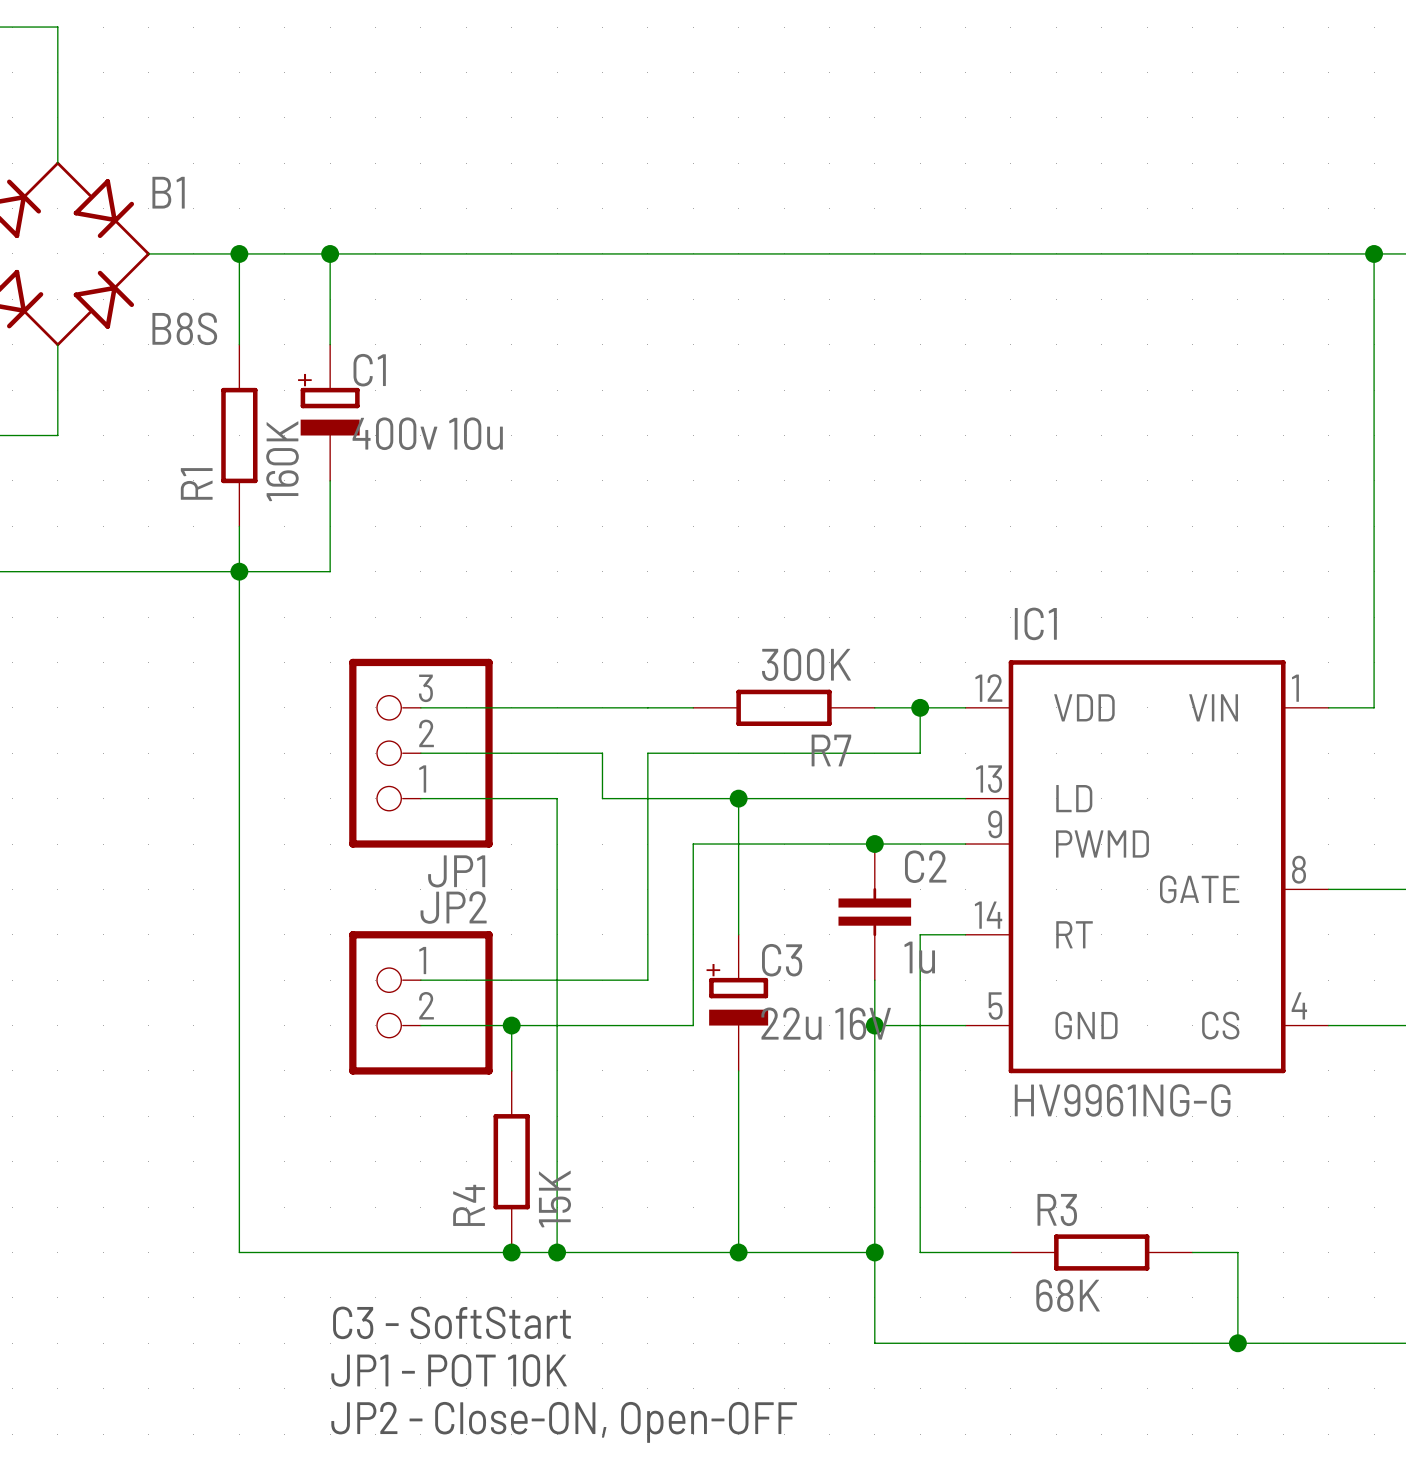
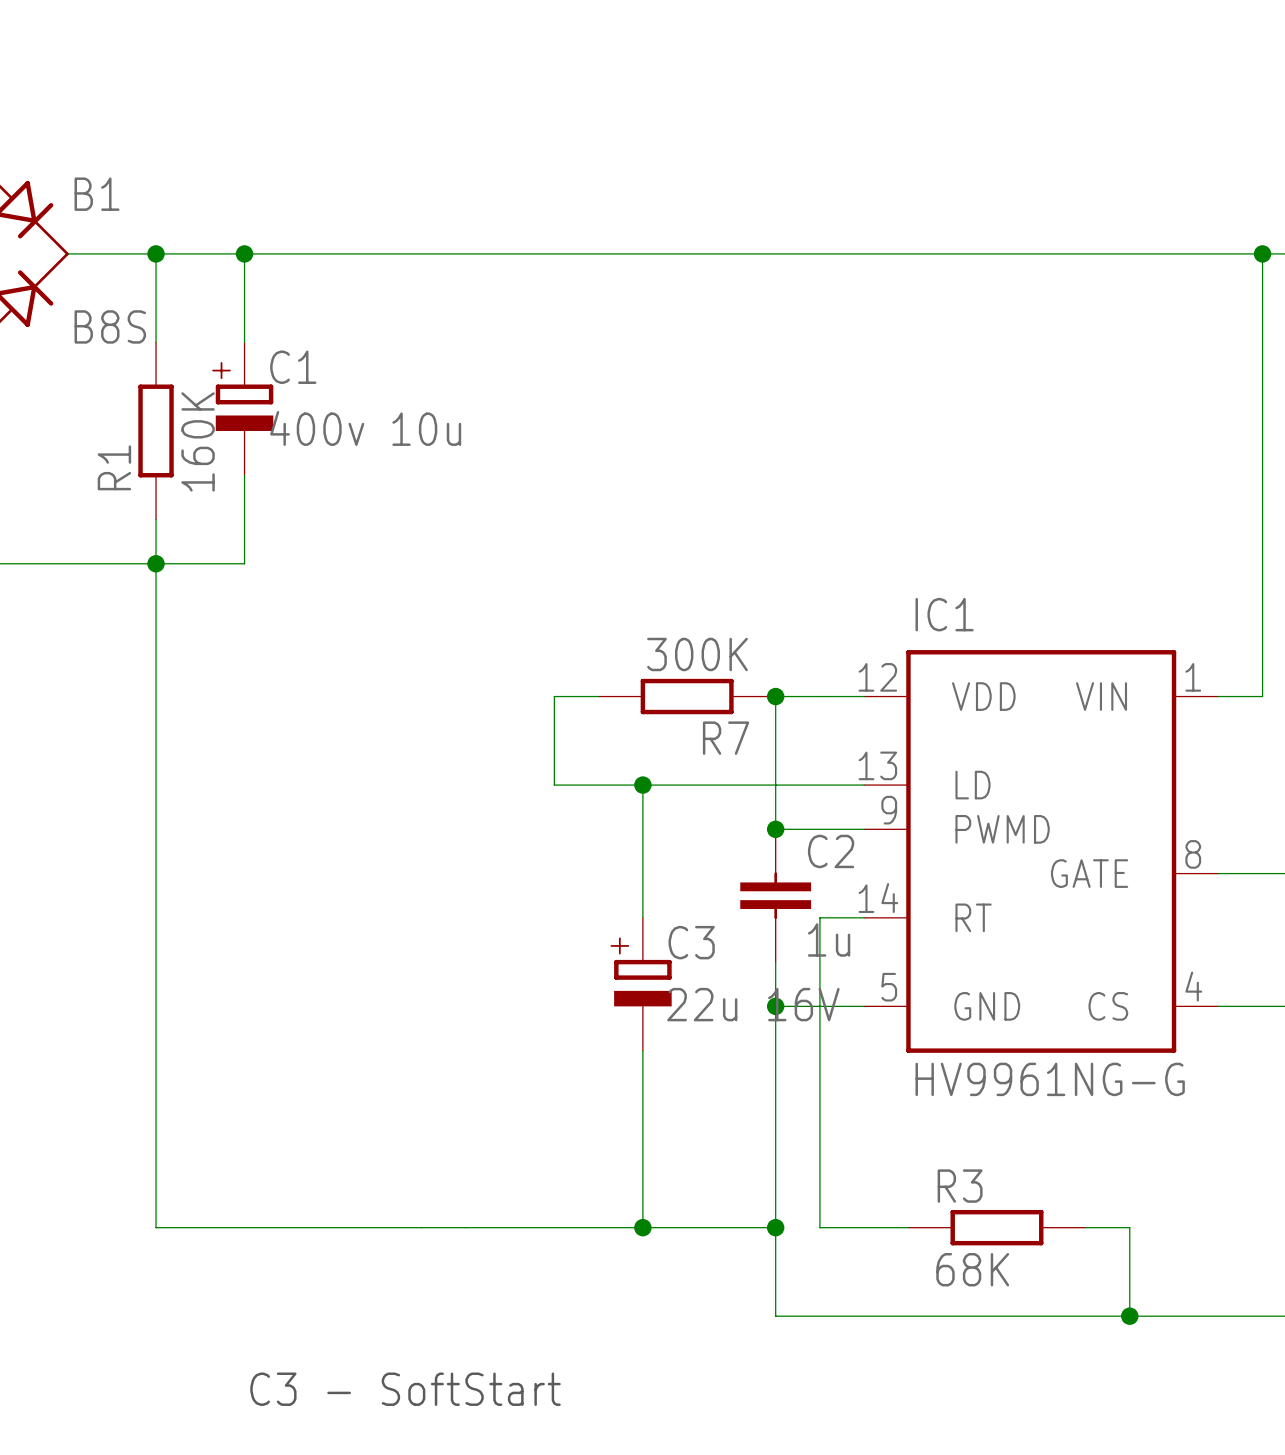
wire: (420, 707) (647, 707) -> (554, 740) (554, 696)
wire: (920, 707) (920, 753) (647, 753) -> none
junction position: (920, 707) -> (775, 696)
wire: (420, 753) (602, 753) (602, 798) (647, 798) (647, 980) (420, 980) -> none
JP1: (420, 753) -> none
wire: (420, 798) (557, 798) (557, 1252) -> none
wire: (874, 844) (693, 844) (693, 1025) (420, 1025) -> (775, 829) (775, 696)
JP2: (420, 1002) -> none
wire: (511, 1025) (511, 1070) -> none
junction: (511, 1025) -> none
R4: 15K (511, 1161) -> none
junction: (511, 1252) -> none
junction: (557, 1252) -> none
text: C3 - SoftStart (452, 1322) -> none
text: JP1 - POT 10K (449, 1370) -> none
text: JP2 - Close-ON, Open-OFF (564, 1422) -> C3 - SoftStart (405, 1389)

